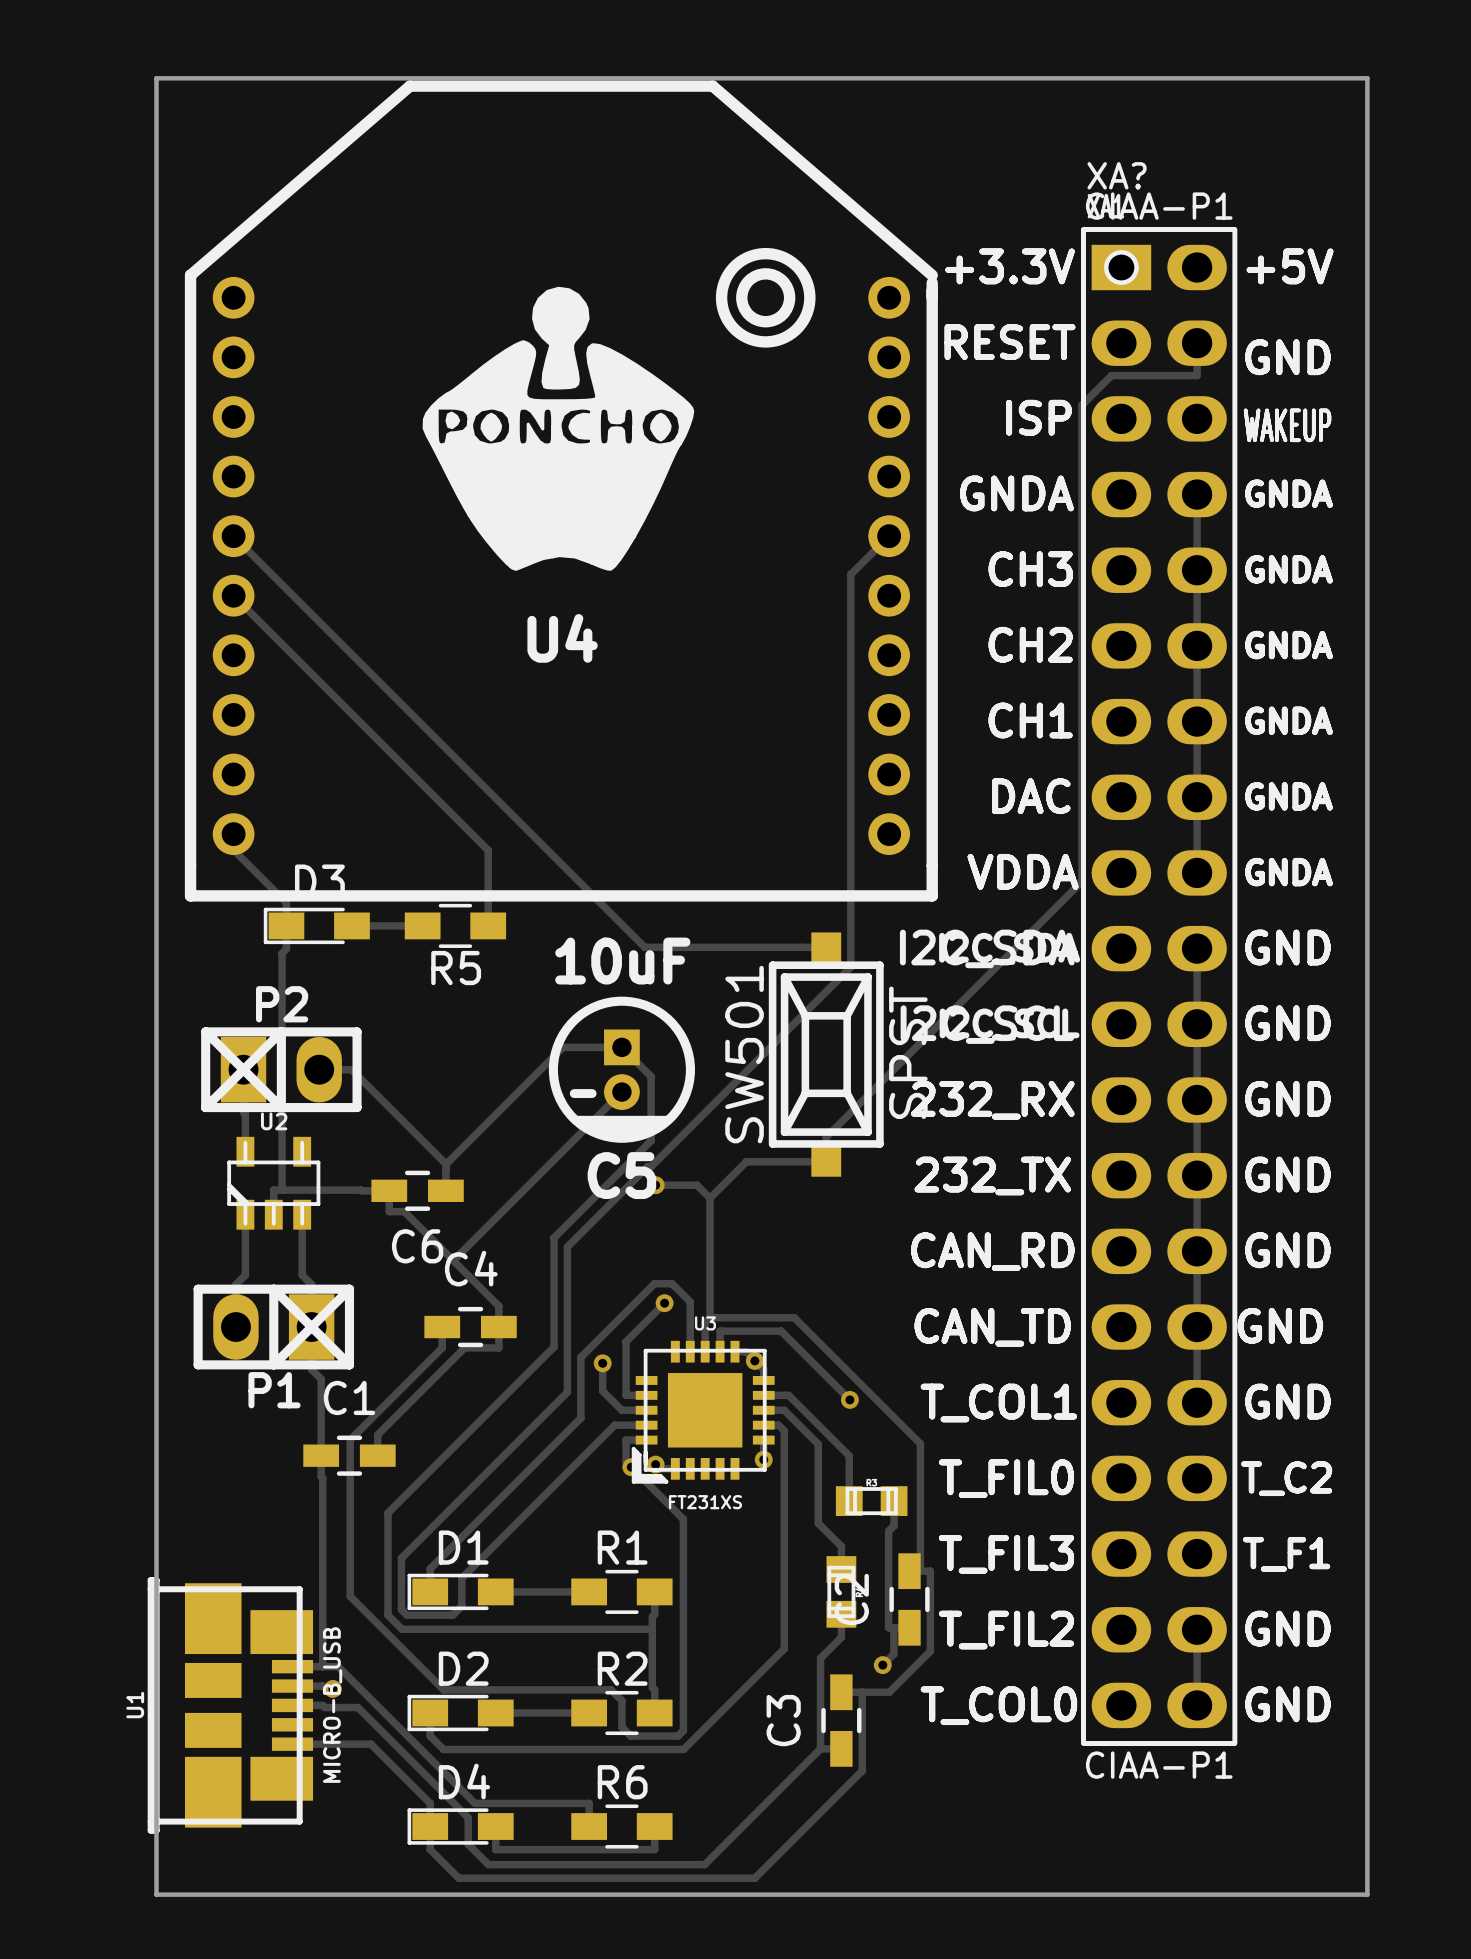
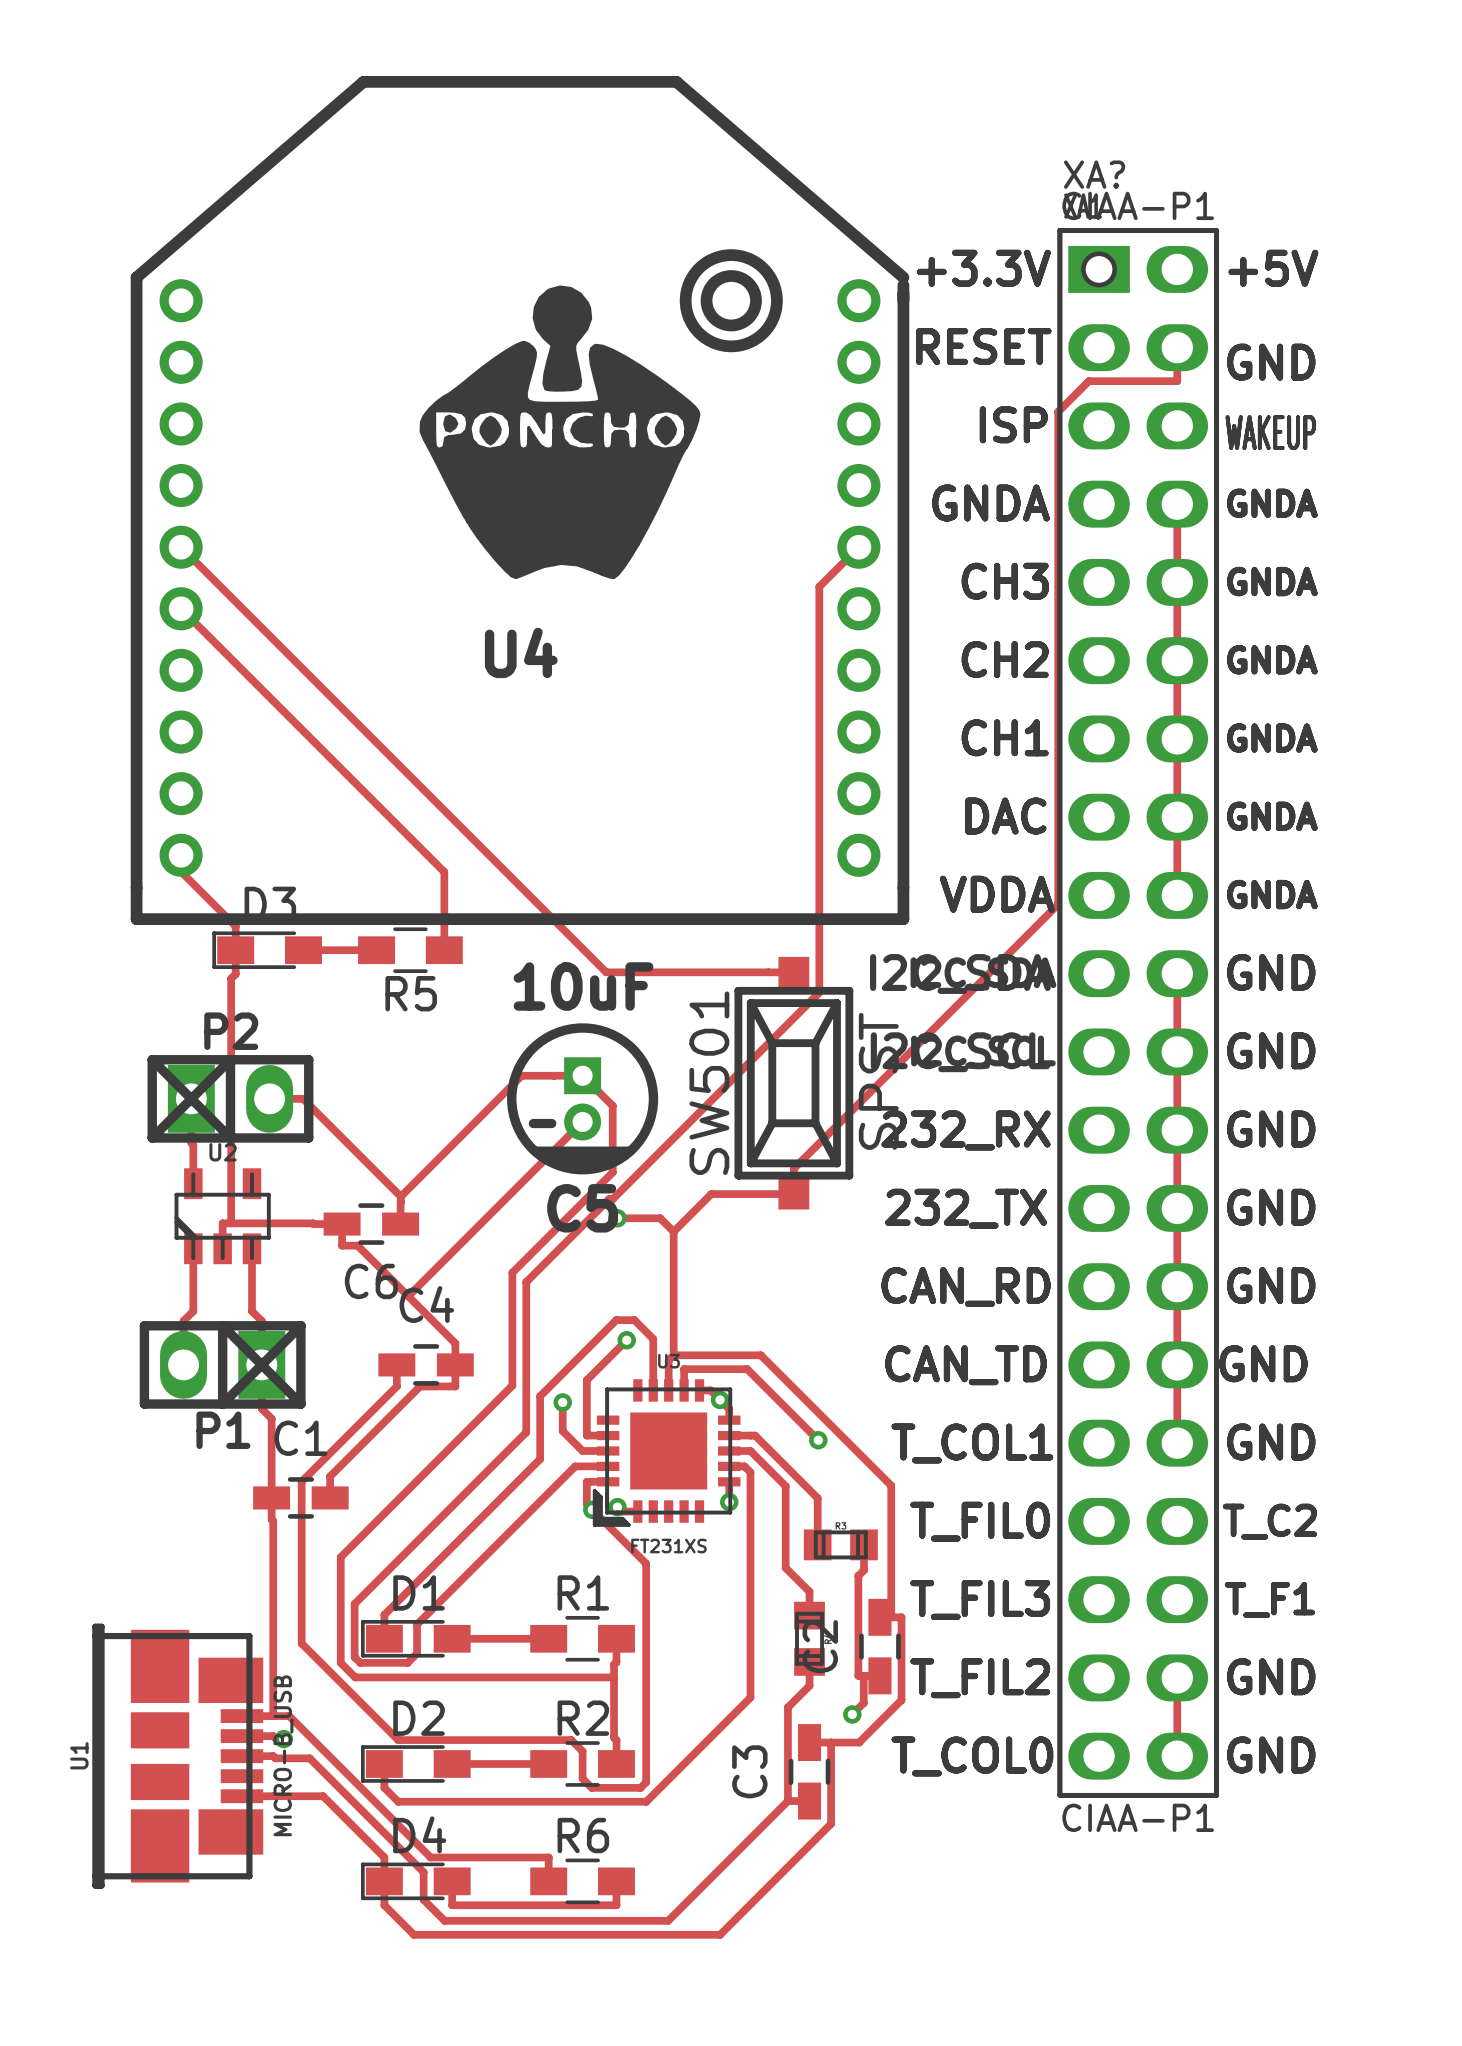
board edge: (156, 78) (156, 1894) (1367, 1894) (1367, 78) (156, 78) -> none
drawing position: (558, 428) -> (559, 432)

